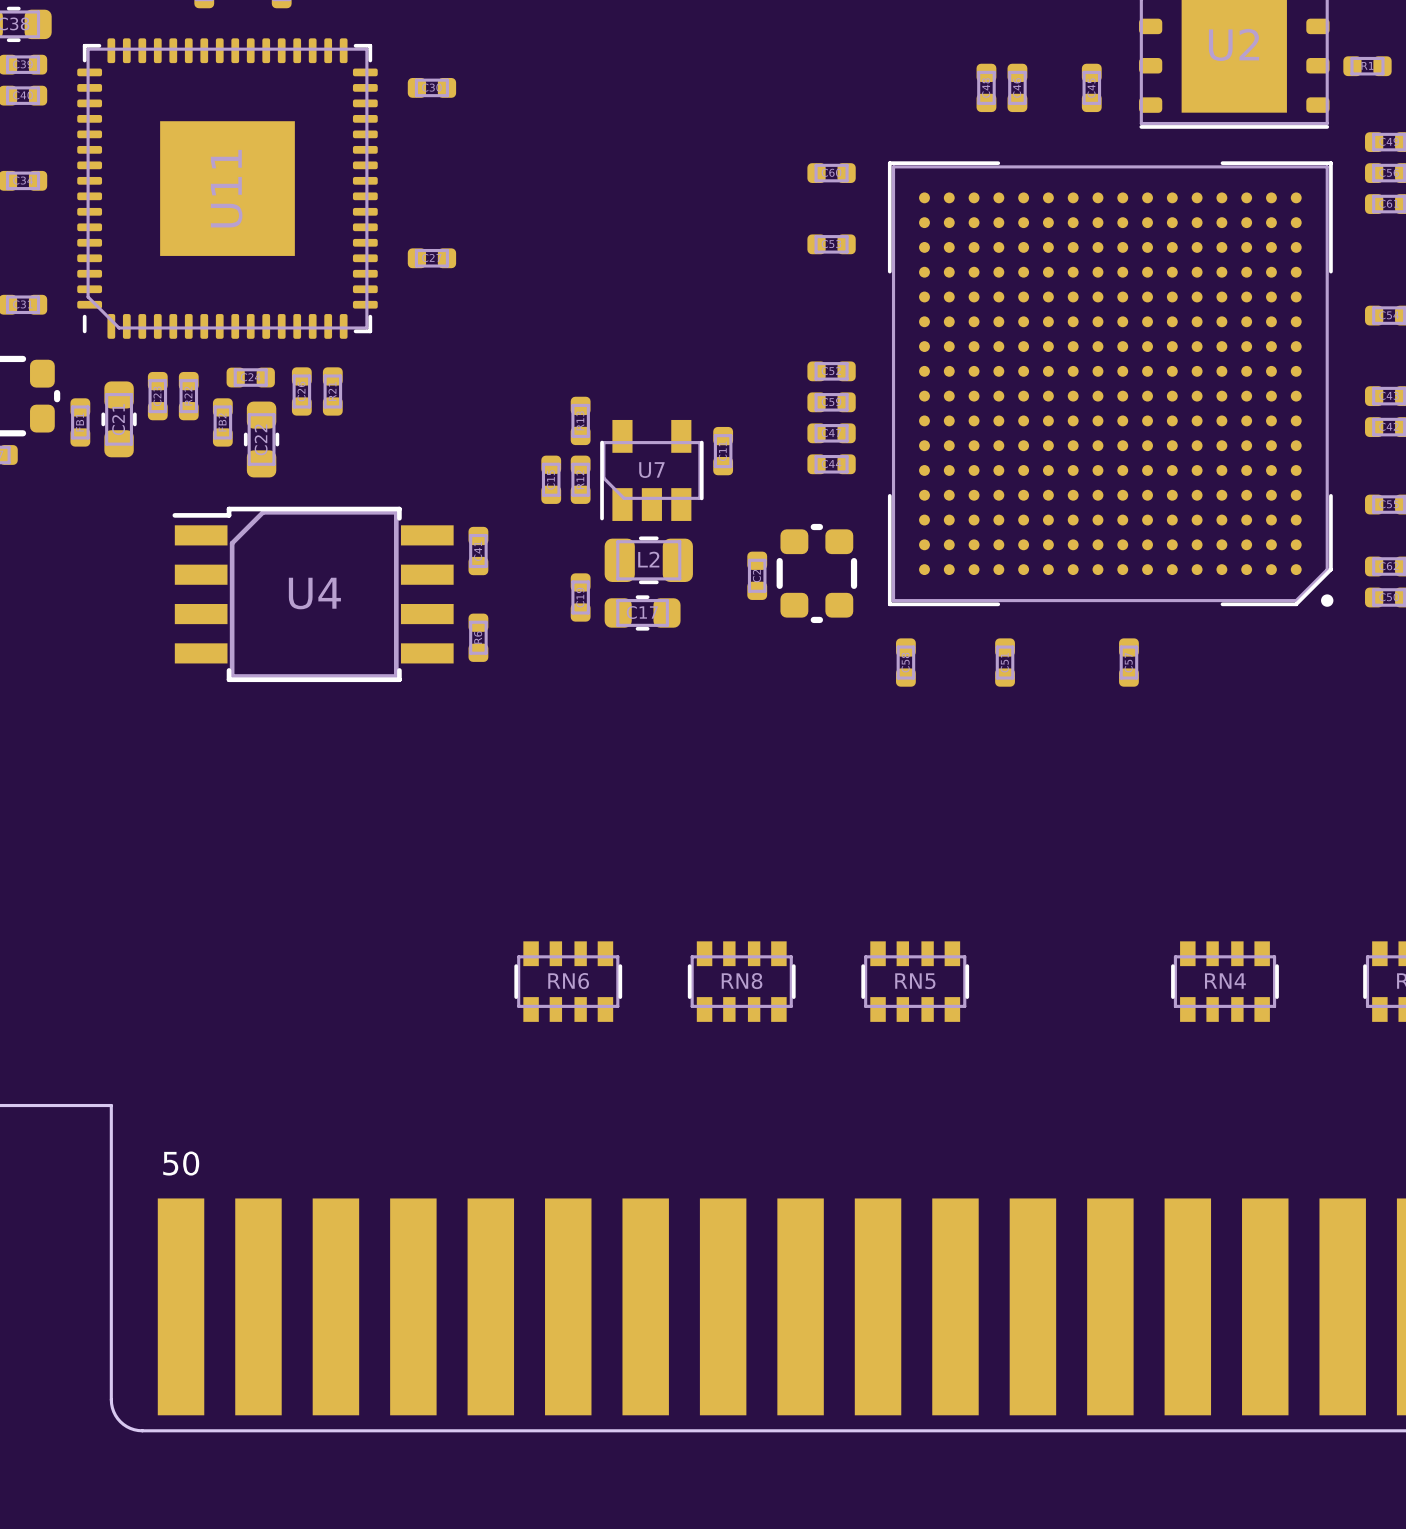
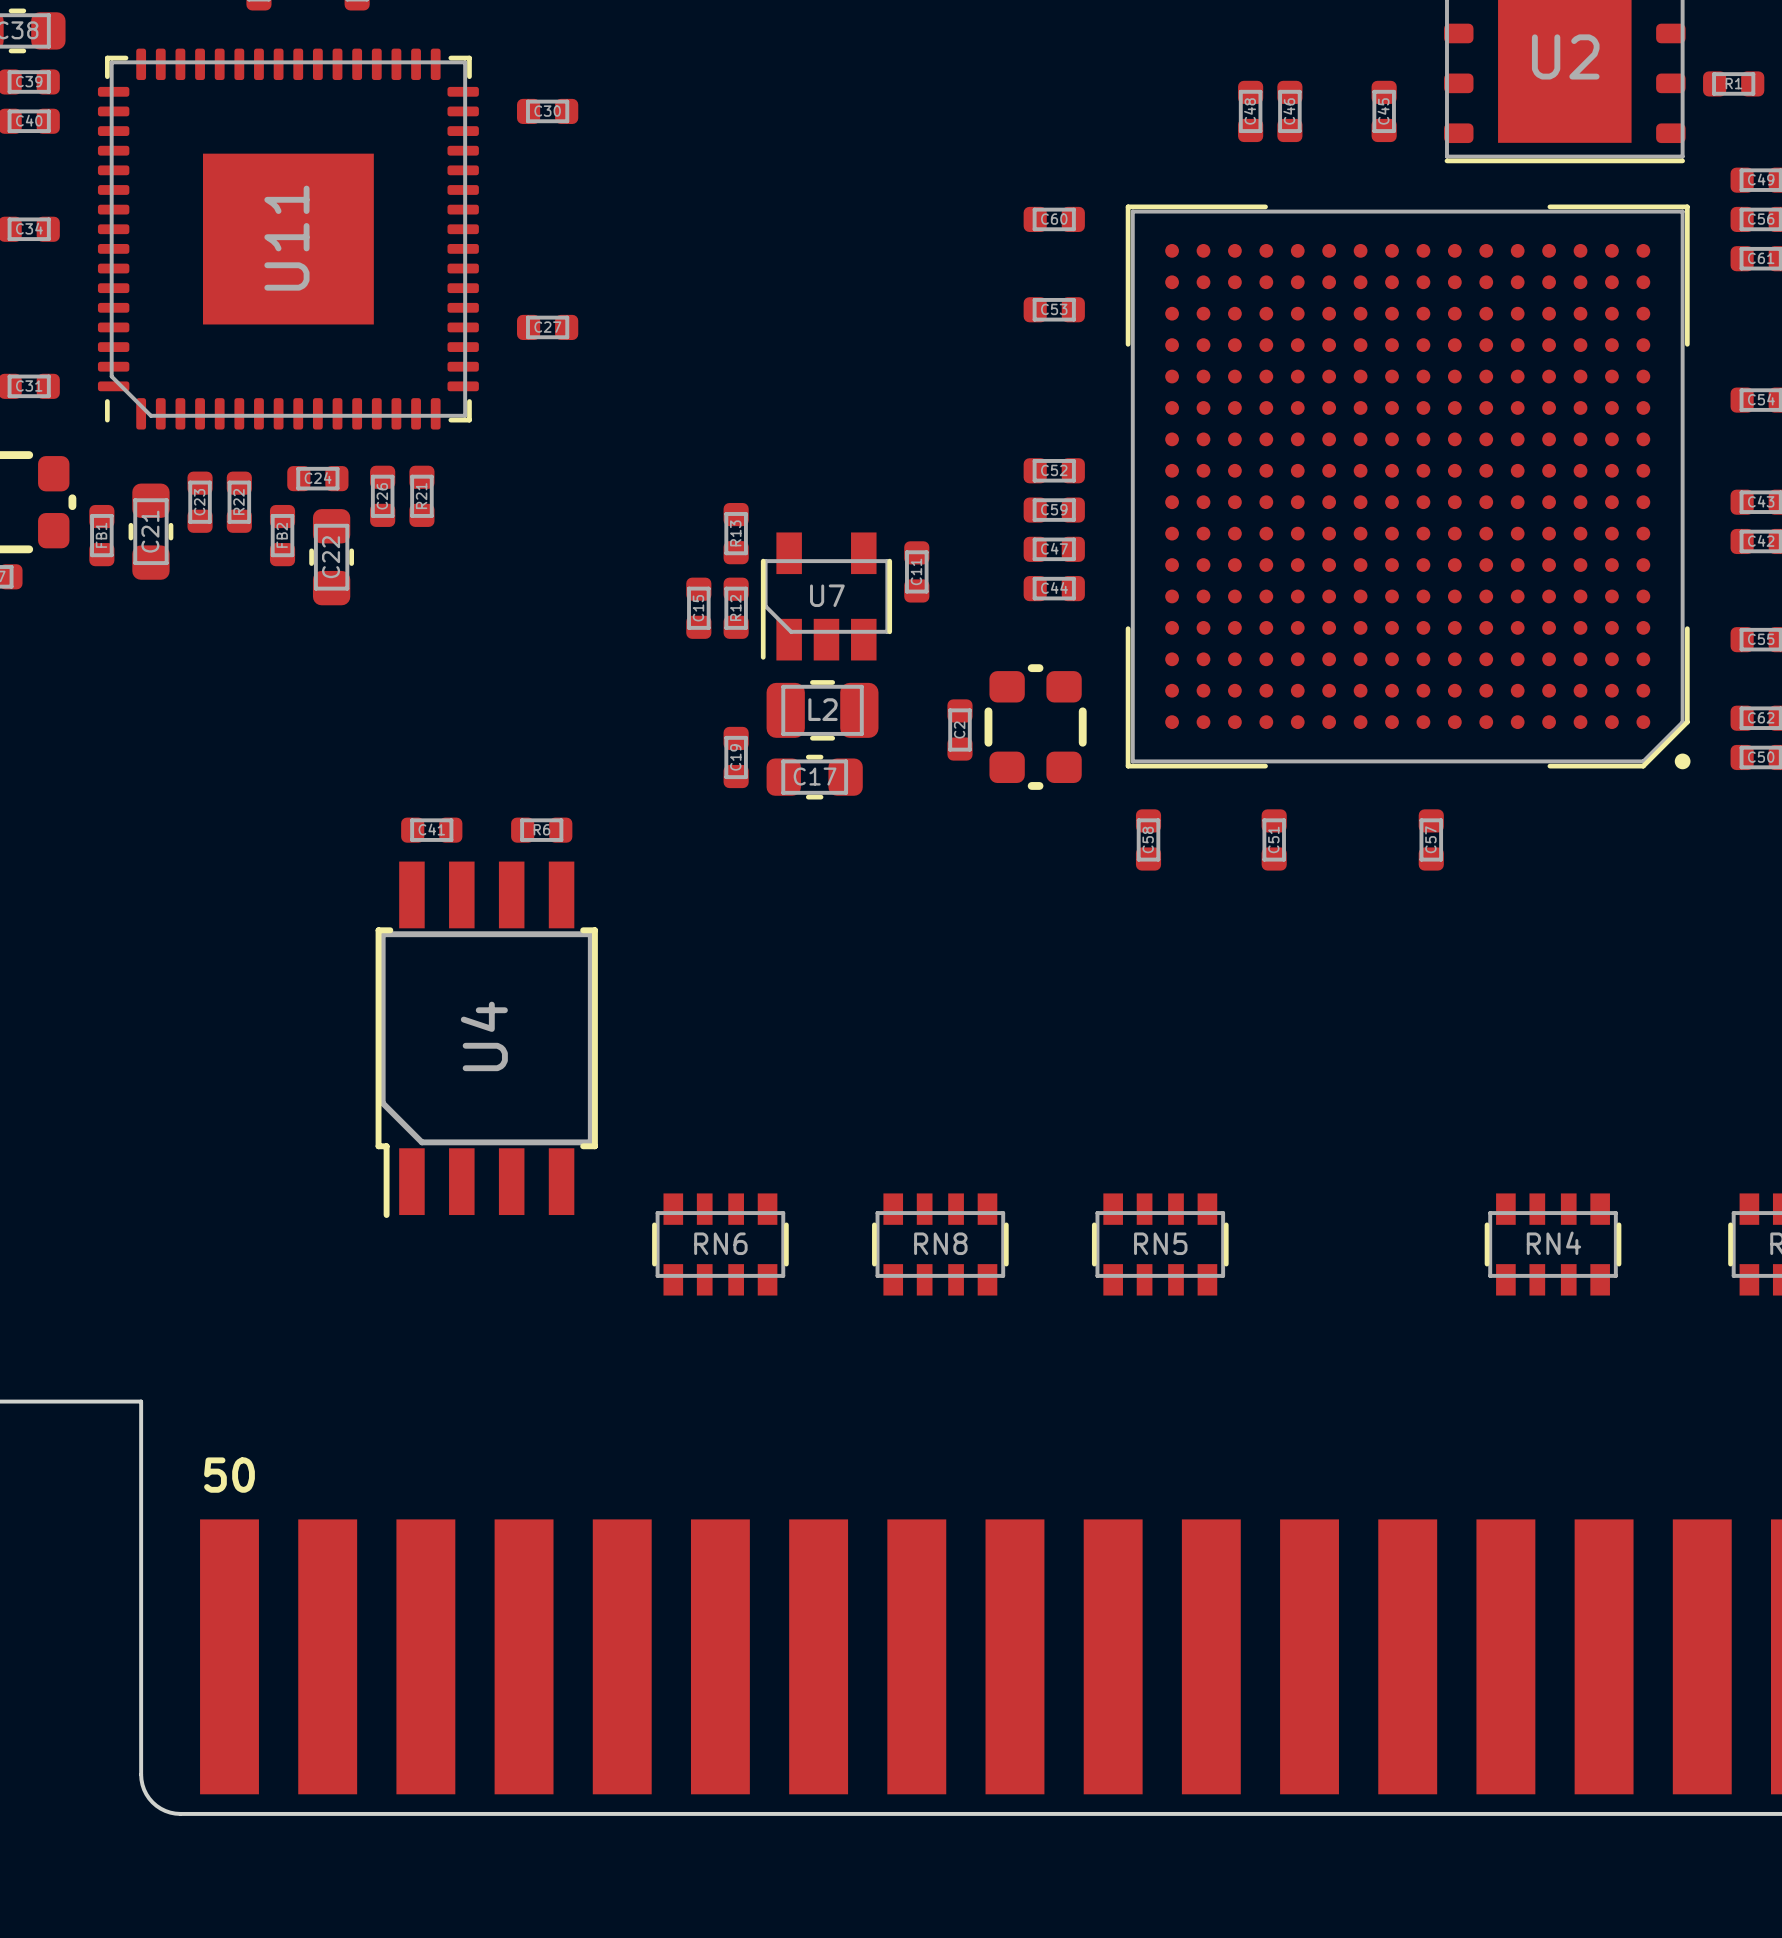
C41 rotation: 0° (478, 551) -> 90° clockwise (431, 830)
C41 position: (478, 551) -> (431, 830)
U4 rotation: 0° (313, 594) -> 90° counterclockwise (486, 1039)
U4 position: (313, 594) -> (486, 1039)
R6 rotation: 0° (478, 637) -> 90° clockwise (541, 830)
R6 position: (478, 637) -> (541, 830)

